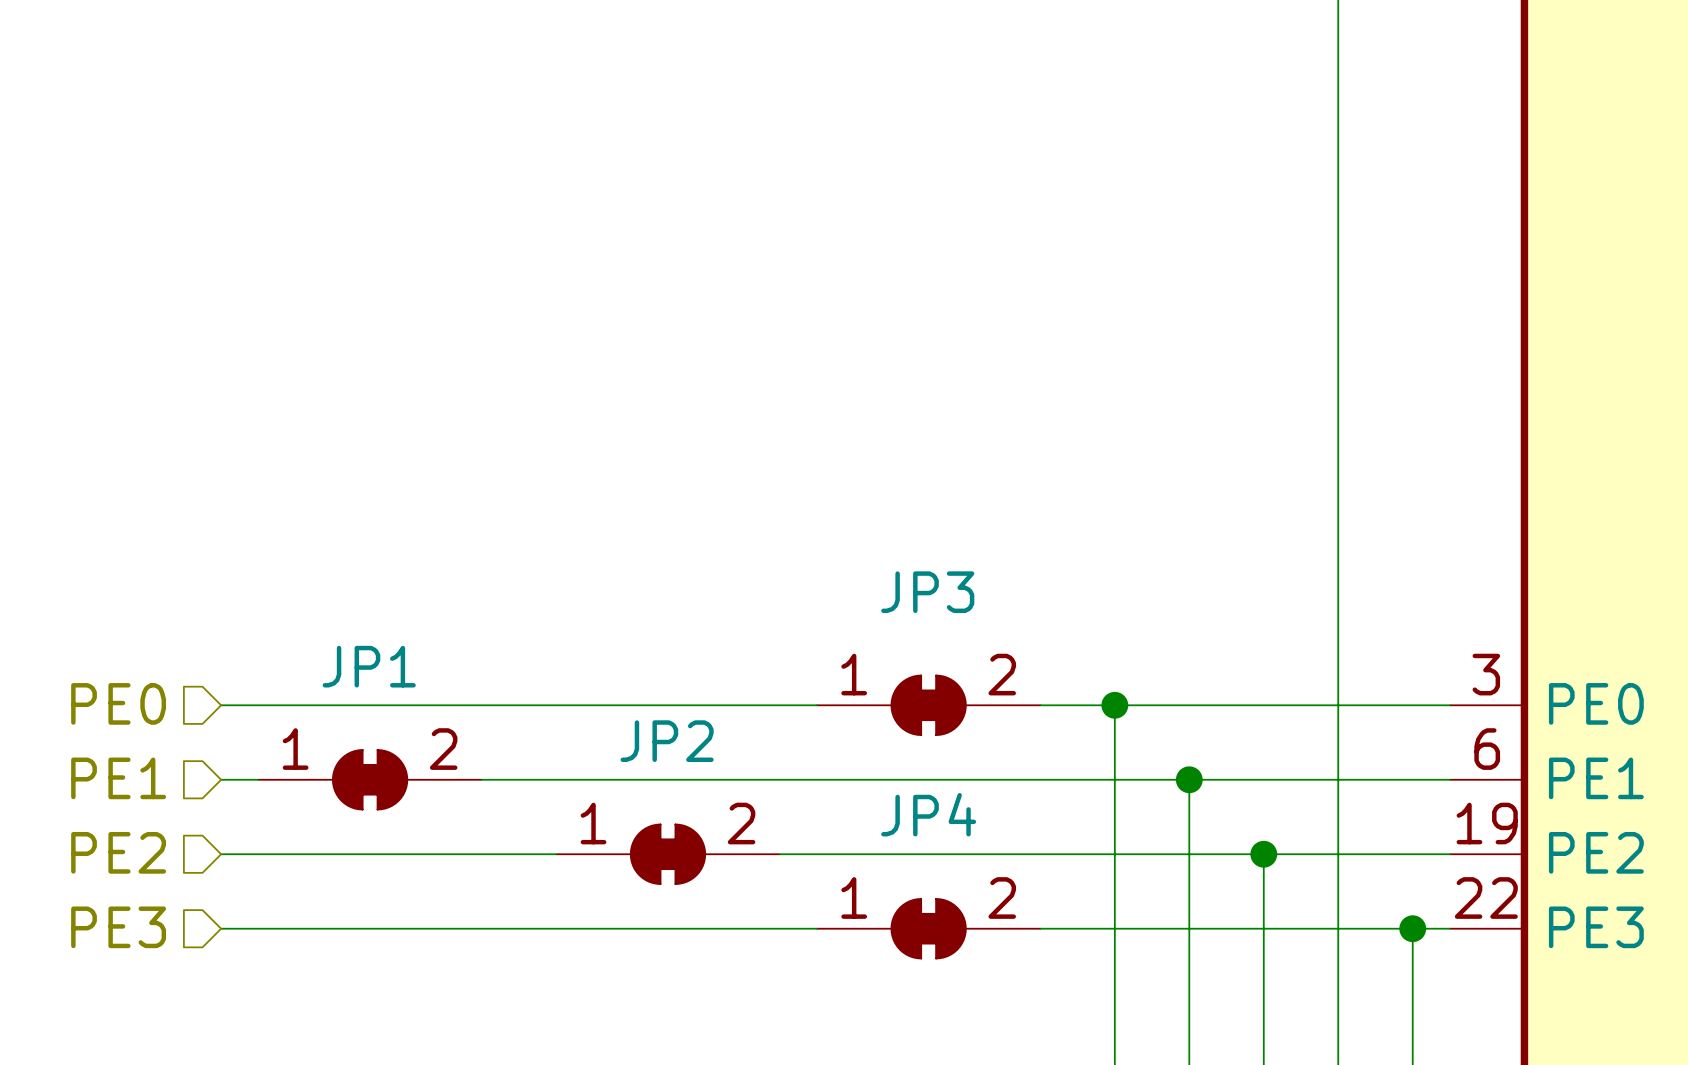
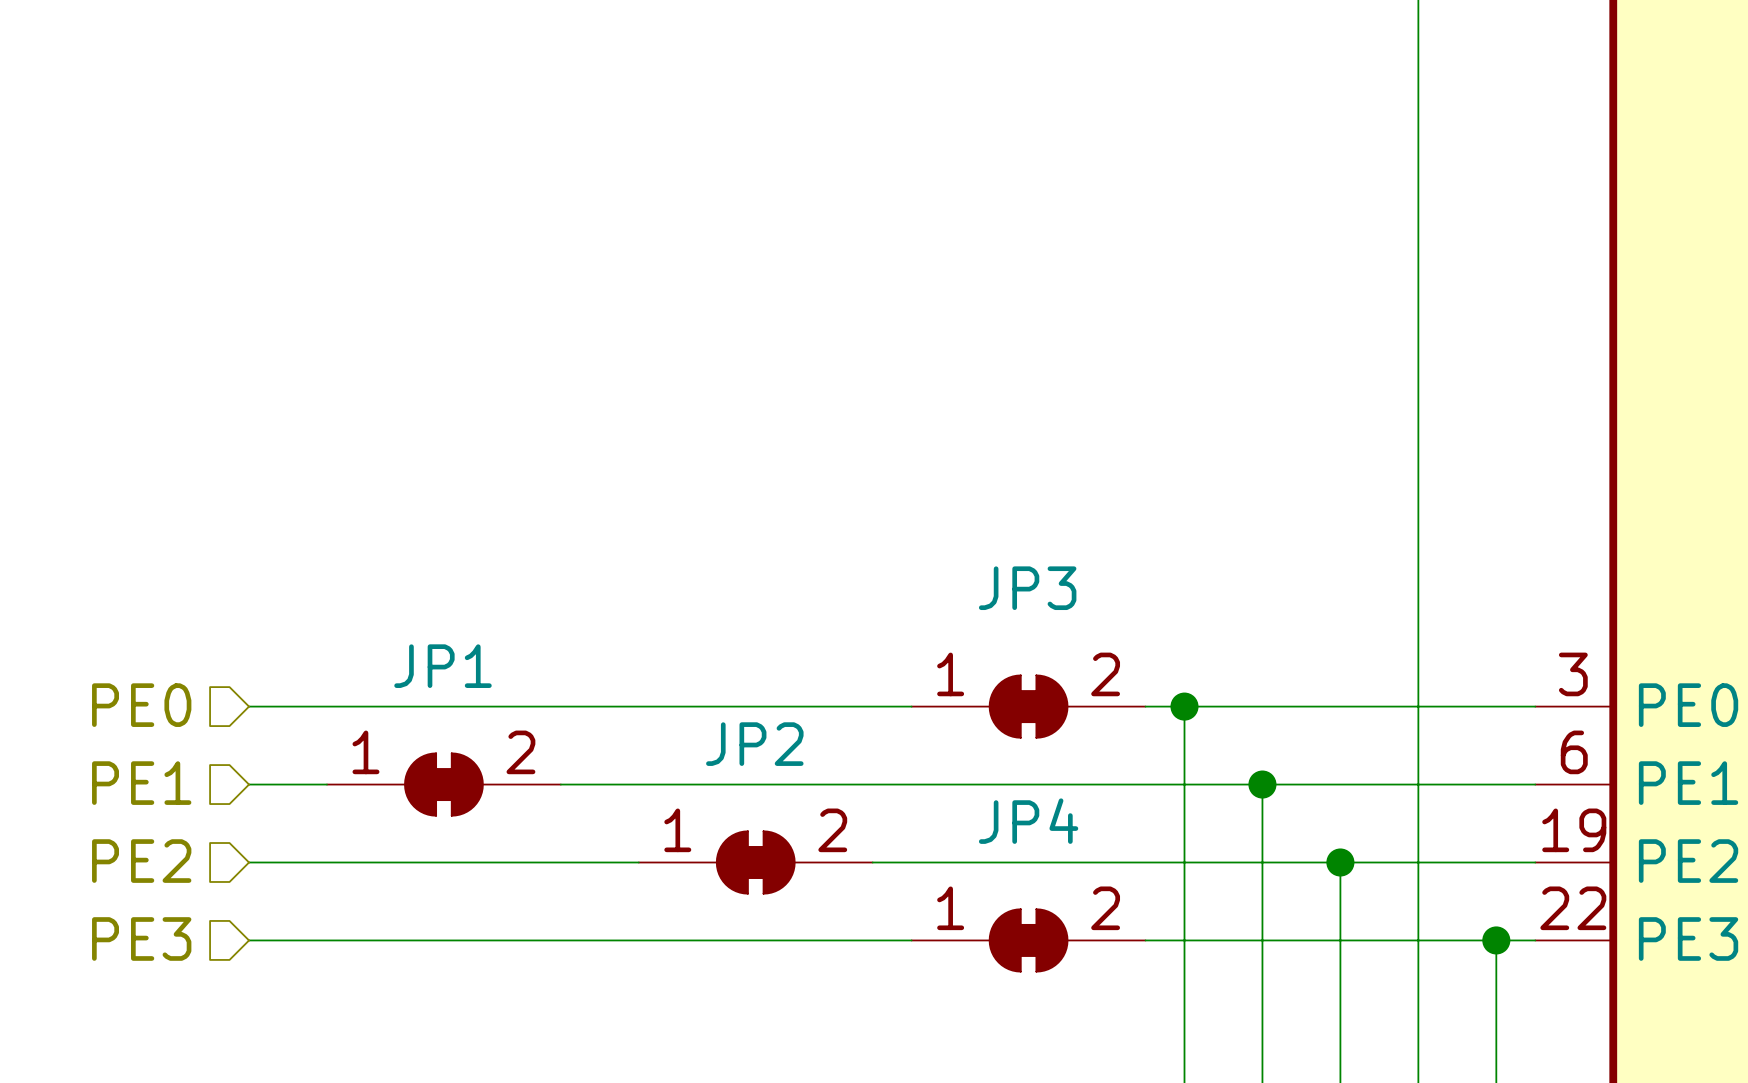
JP3 position: (928, 705) -> (1028, 706)
JP1 position: (370, 779) -> (443, 784)
JP2 position: (667, 854) -> (755, 862)
JP4 position: (928, 928) -> (1028, 940)

